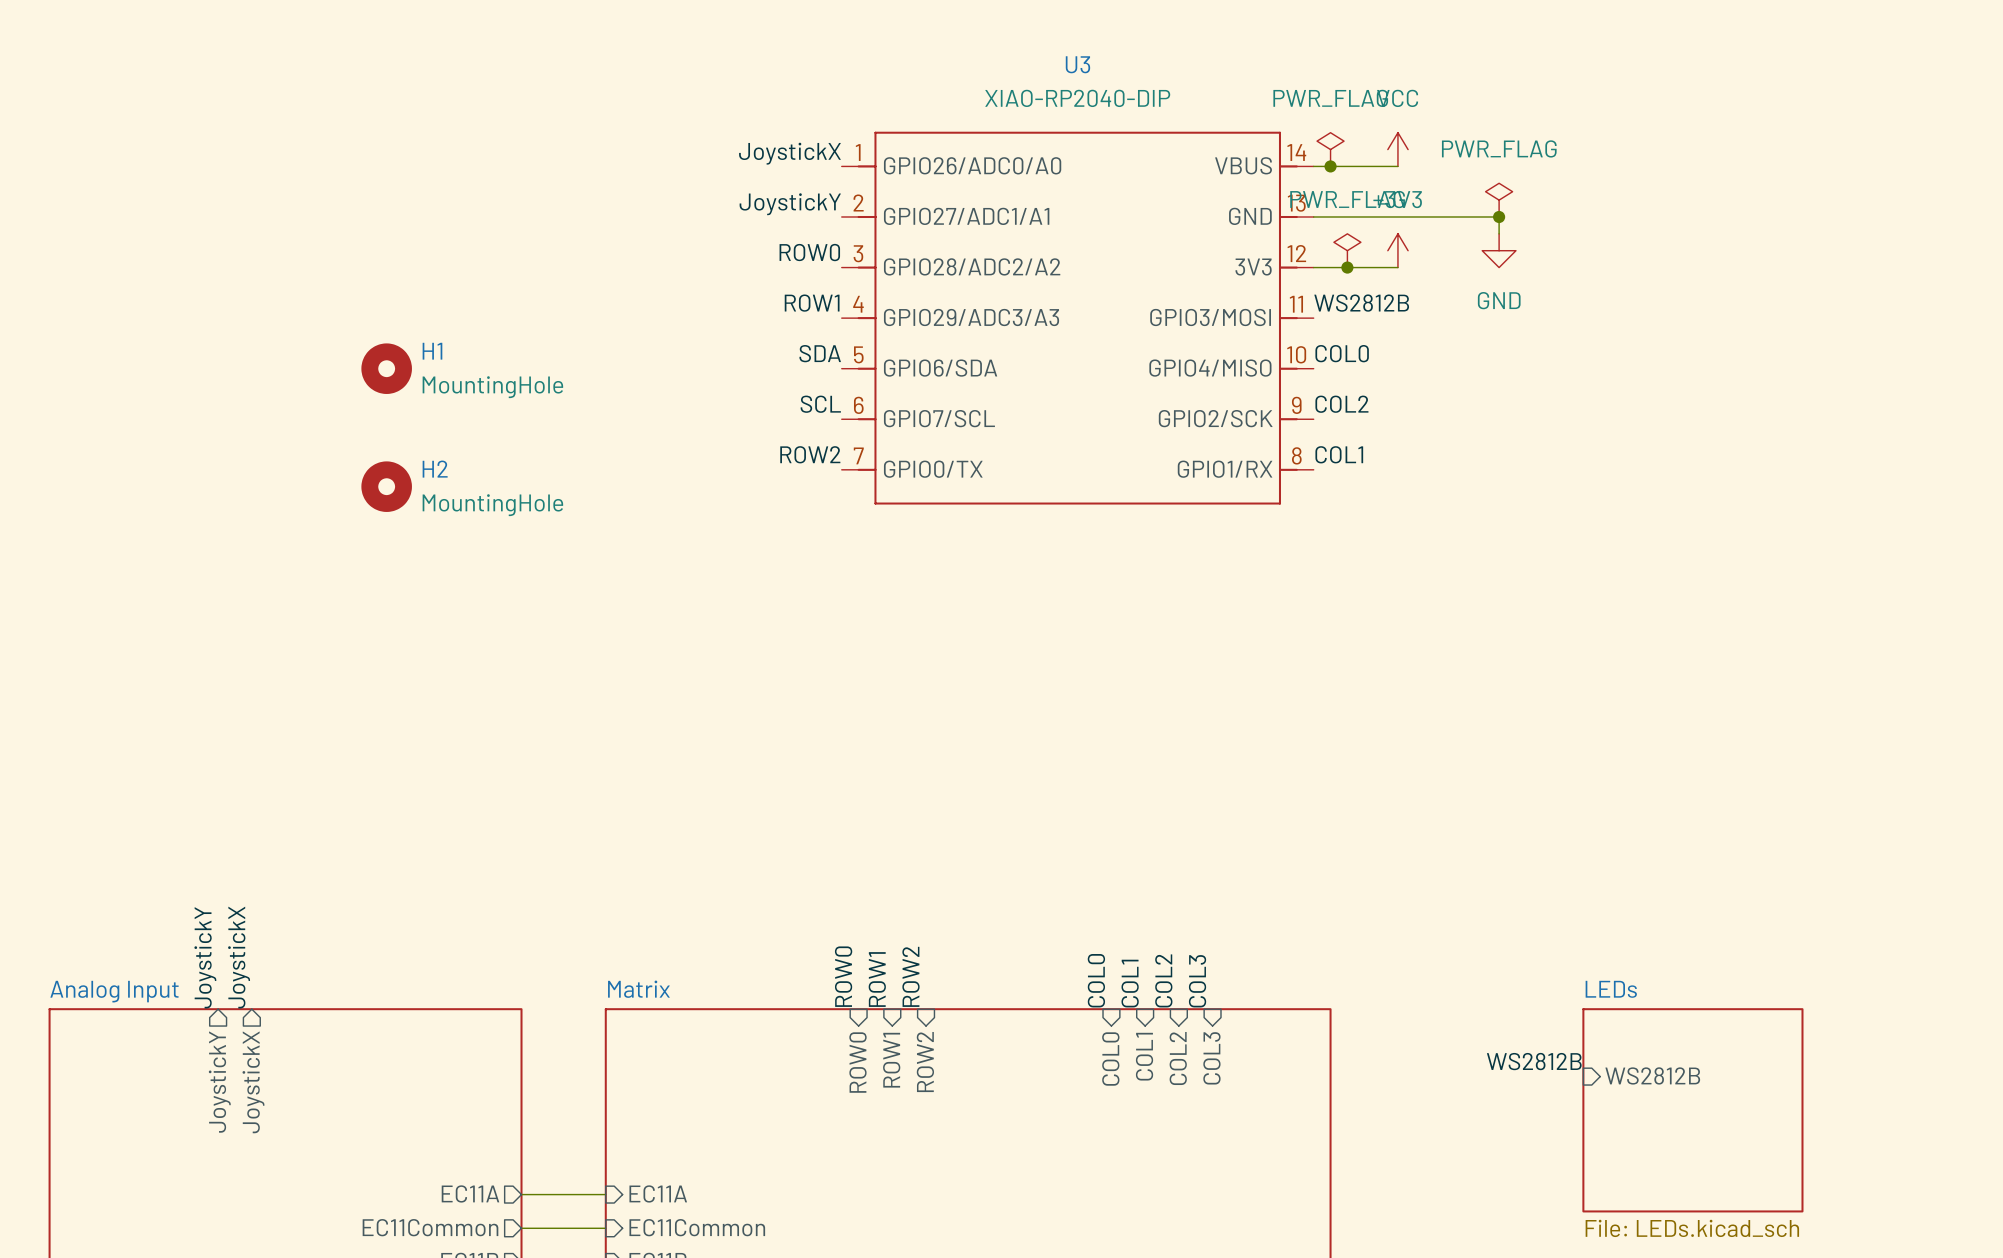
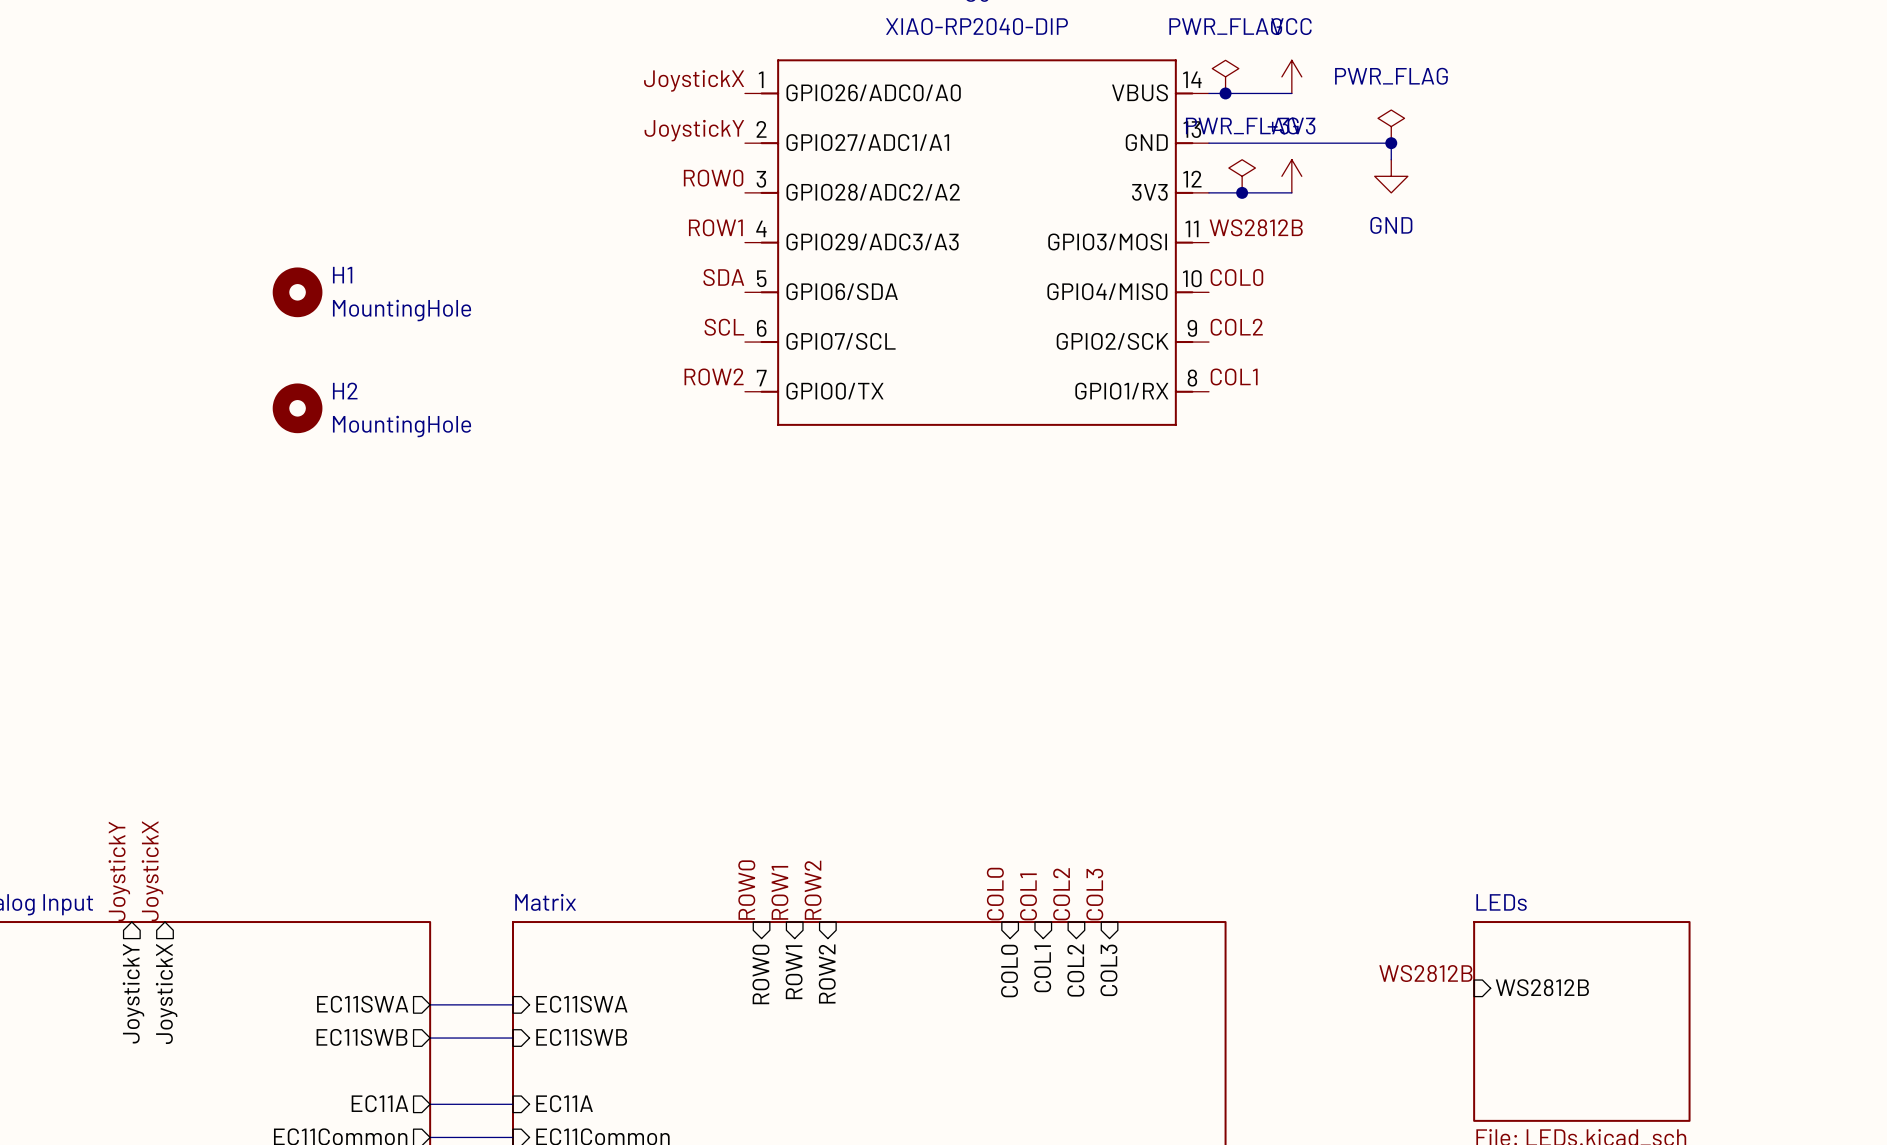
sheet pin: none -> EC11SWA (362, 1004)
sheet pin: none -> EC11SWA (581, 1004)
wire: none -> (430, 1004) (512, 1004)
sheet pin: none -> EC11SWB (361, 1037)
sheet pin: none -> EC11SWB (581, 1037)
wire: none -> (430, 1038) (512, 1038)

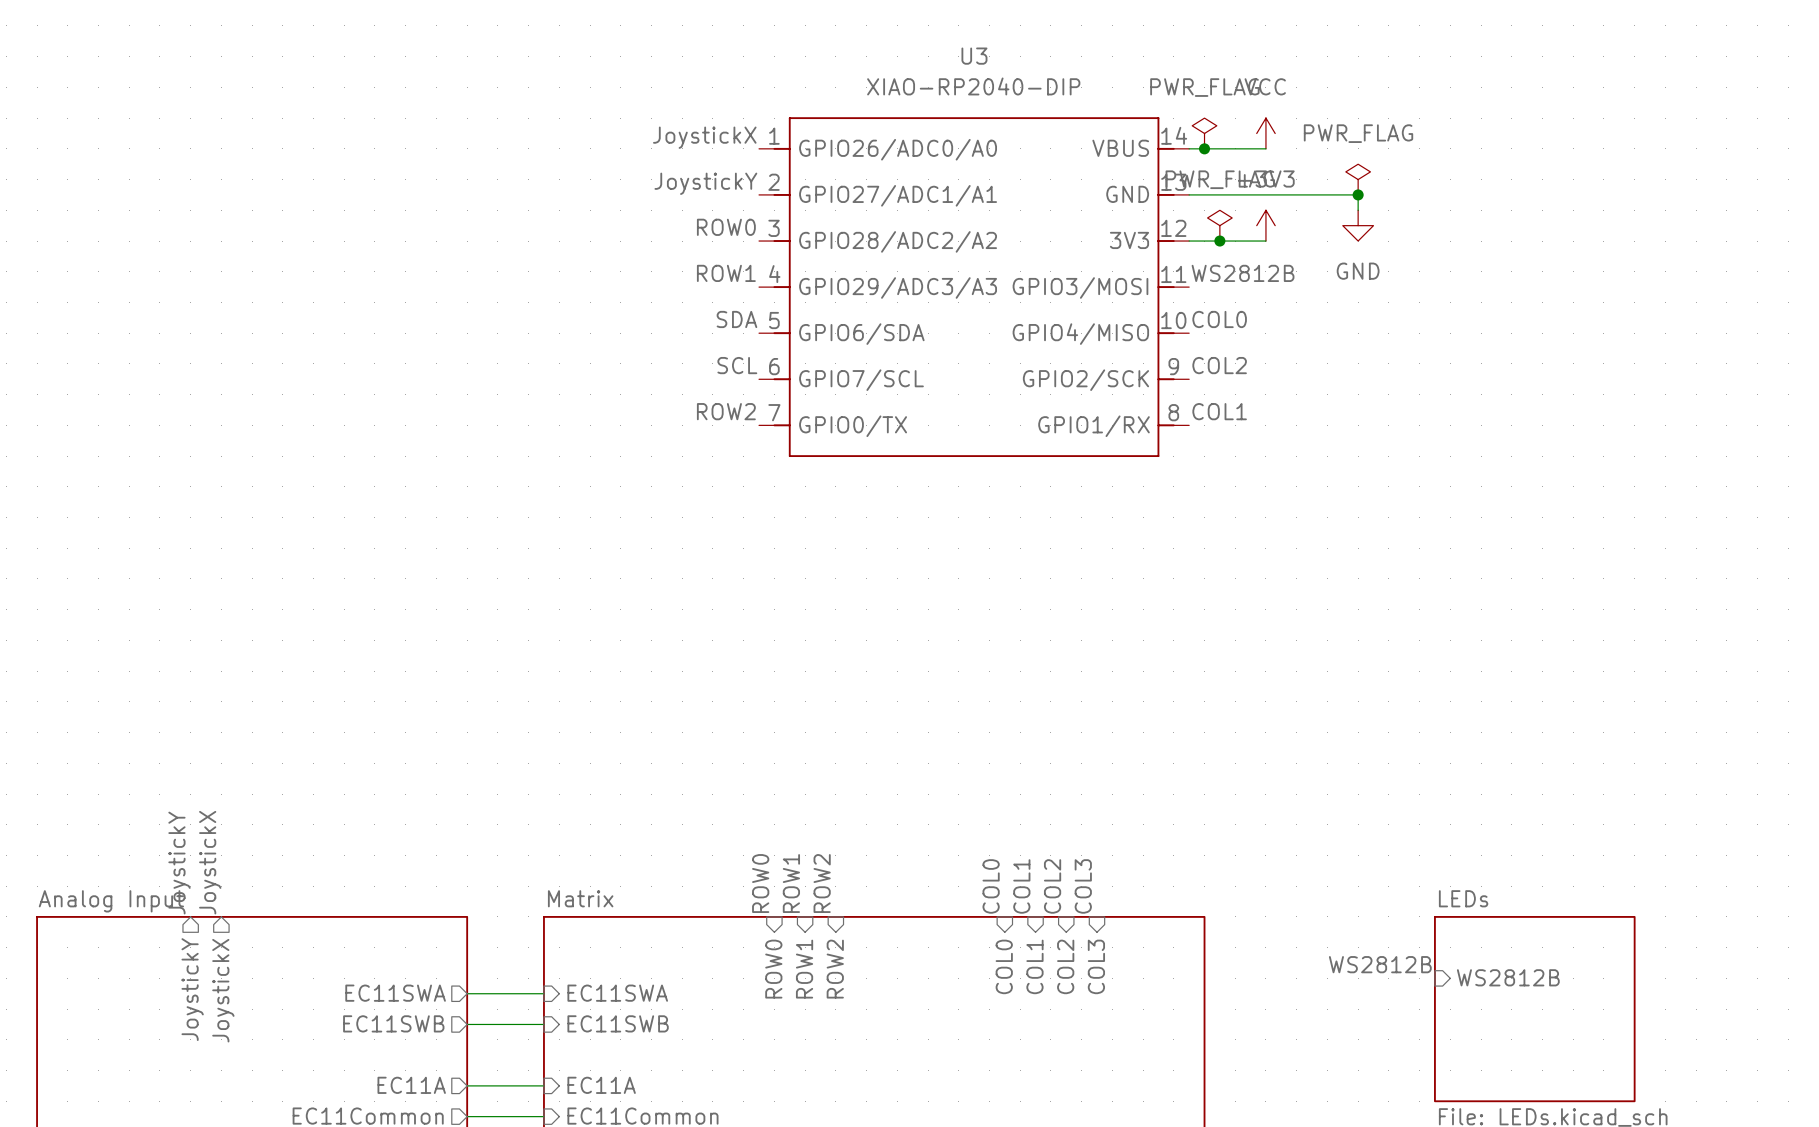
H1: MountingHole (297, 292) -> none
H2: MountingHole (297, 408) -> none

